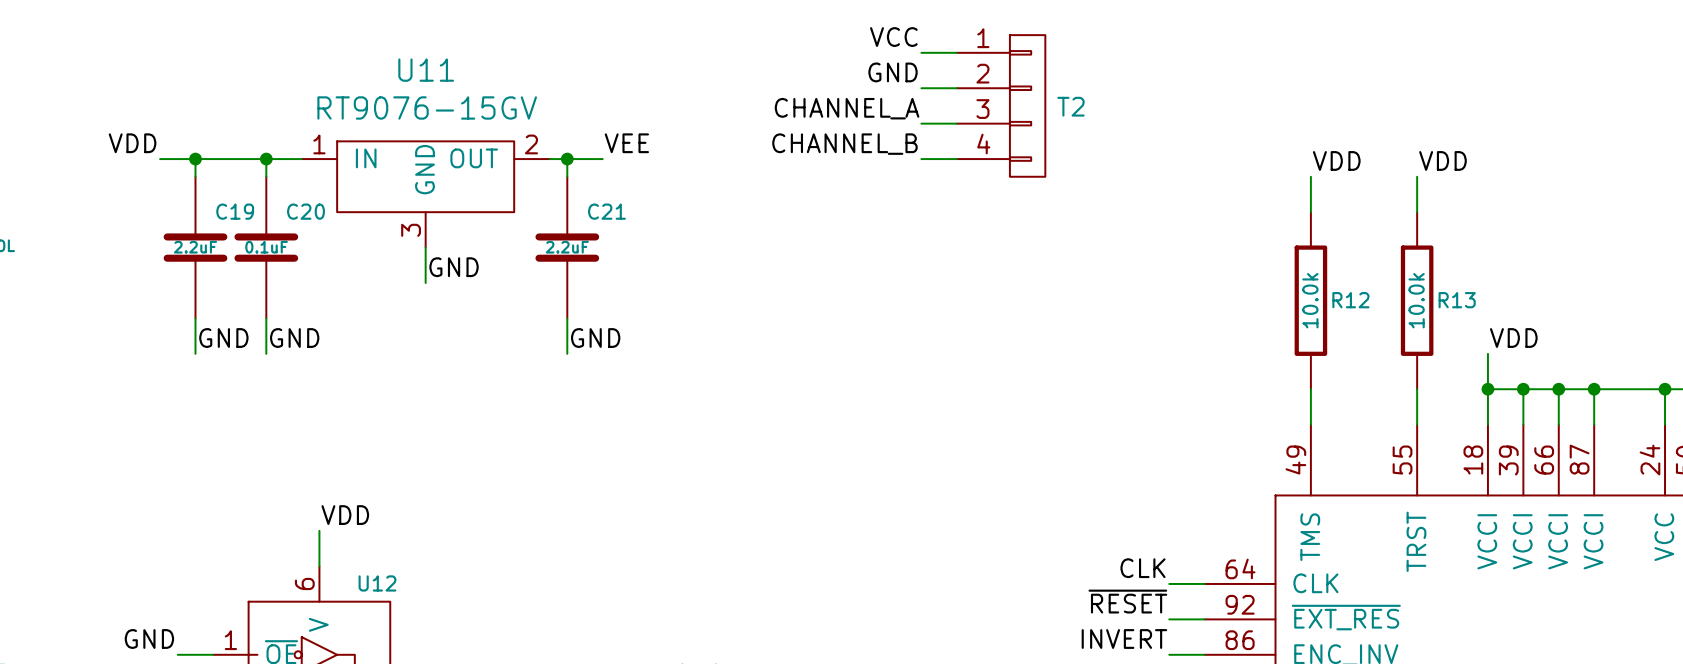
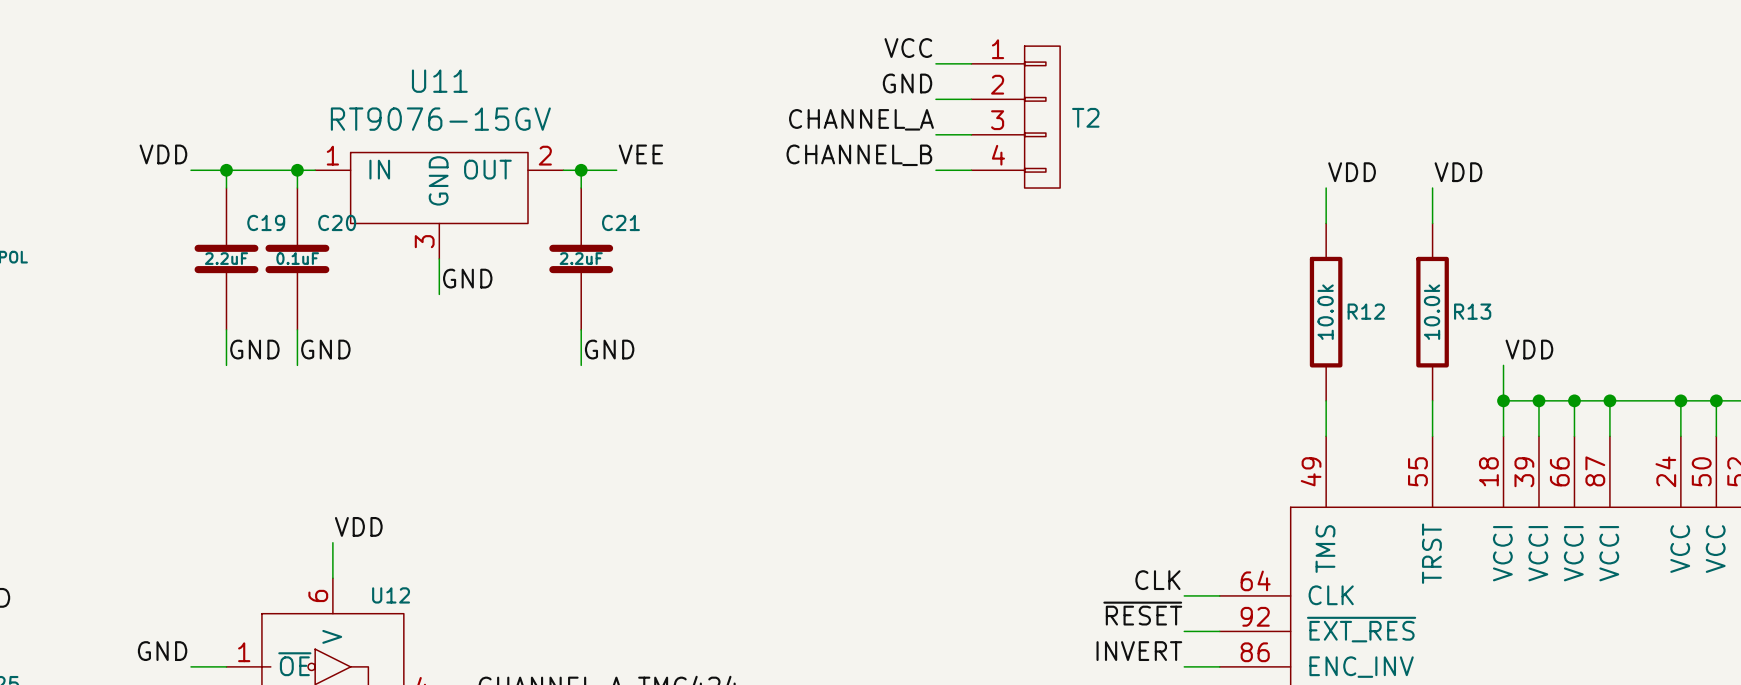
label position: VDD (132, 143) -> VDD (163, 154)
wire: (160, 159) (177, 159) -> none
wire: (195, 159) (195, 176) -> (226, 170) (226, 188)
junction position: (195, 159) -> (226, 170)
wire: (266, 159) (266, 176) -> (297, 170) (297, 188)
junction position: (266, 159) -> (297, 170)
C19 position: (195, 247) -> (226, 258)
C20 position: (266, 247) -> (297, 258)
wire: (195, 318) (195, 353) -> (226, 329) (226, 365)
wire: (266, 318) (266, 353) -> (297, 329) (297, 365)
label position: GND (223, 338) -> GND (254, 349)
label position: GND (294, 338) -> GND (325, 349)

